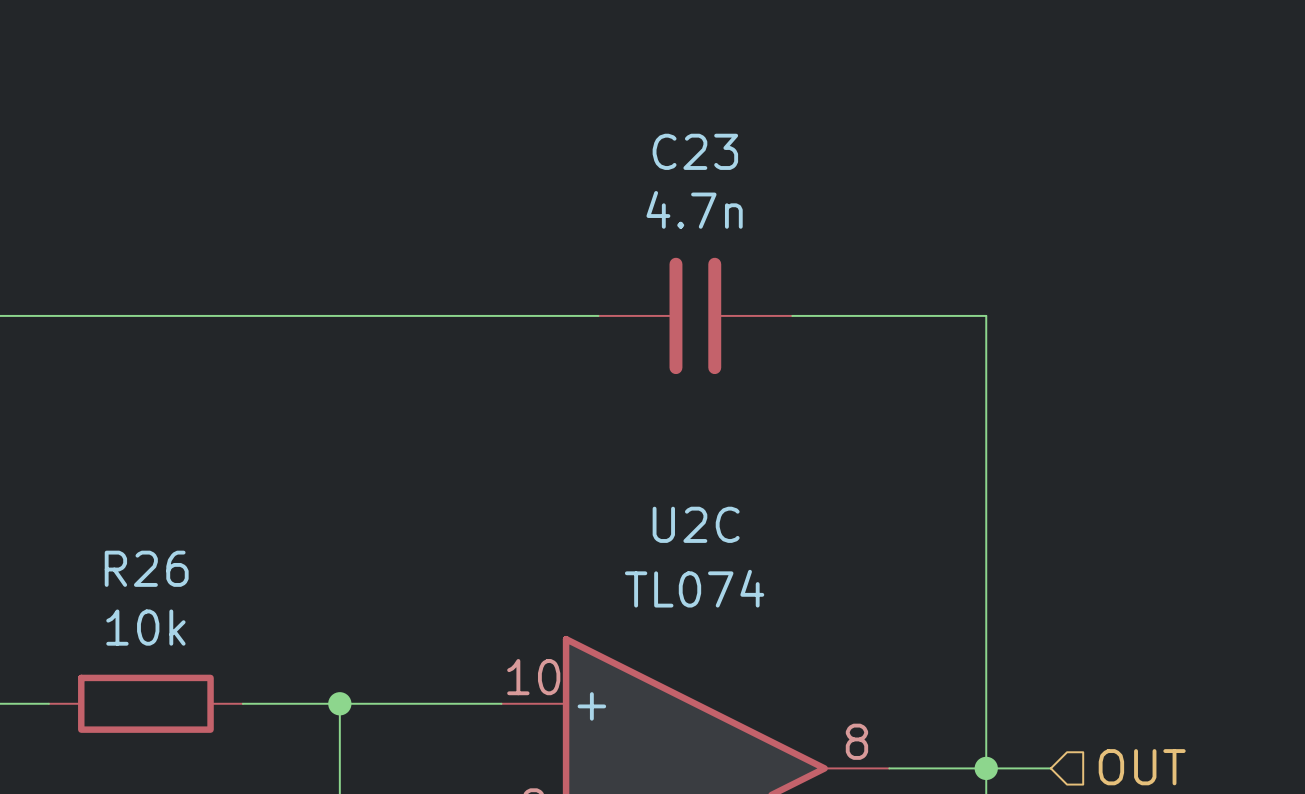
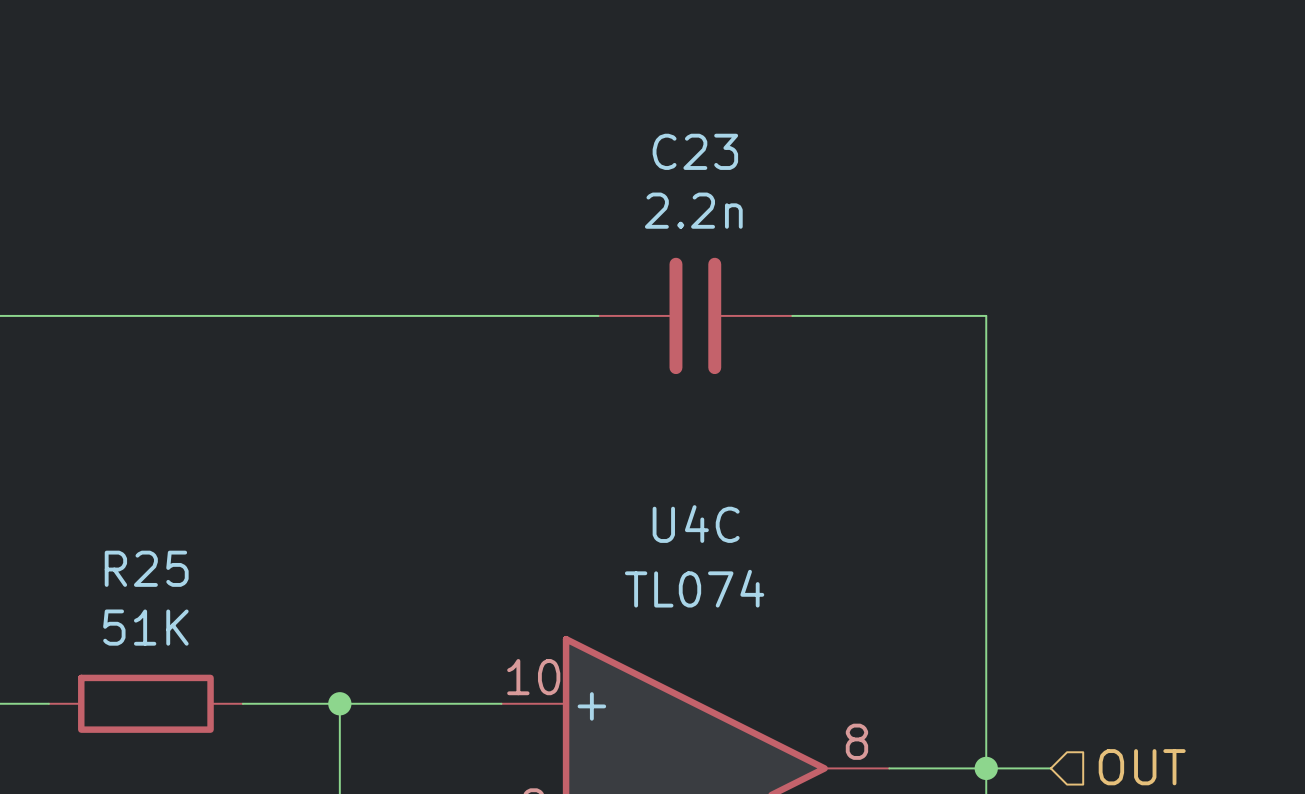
C23 value: 4.7n (694, 209) -> 2.2n (693, 210)
U2C name: U2C (696, 524) -> U4C (696, 524)
R26 name: R26 (146, 568) -> R25 (146, 568)
R26 value: 10k (145, 627) -> 51K (145, 627)

